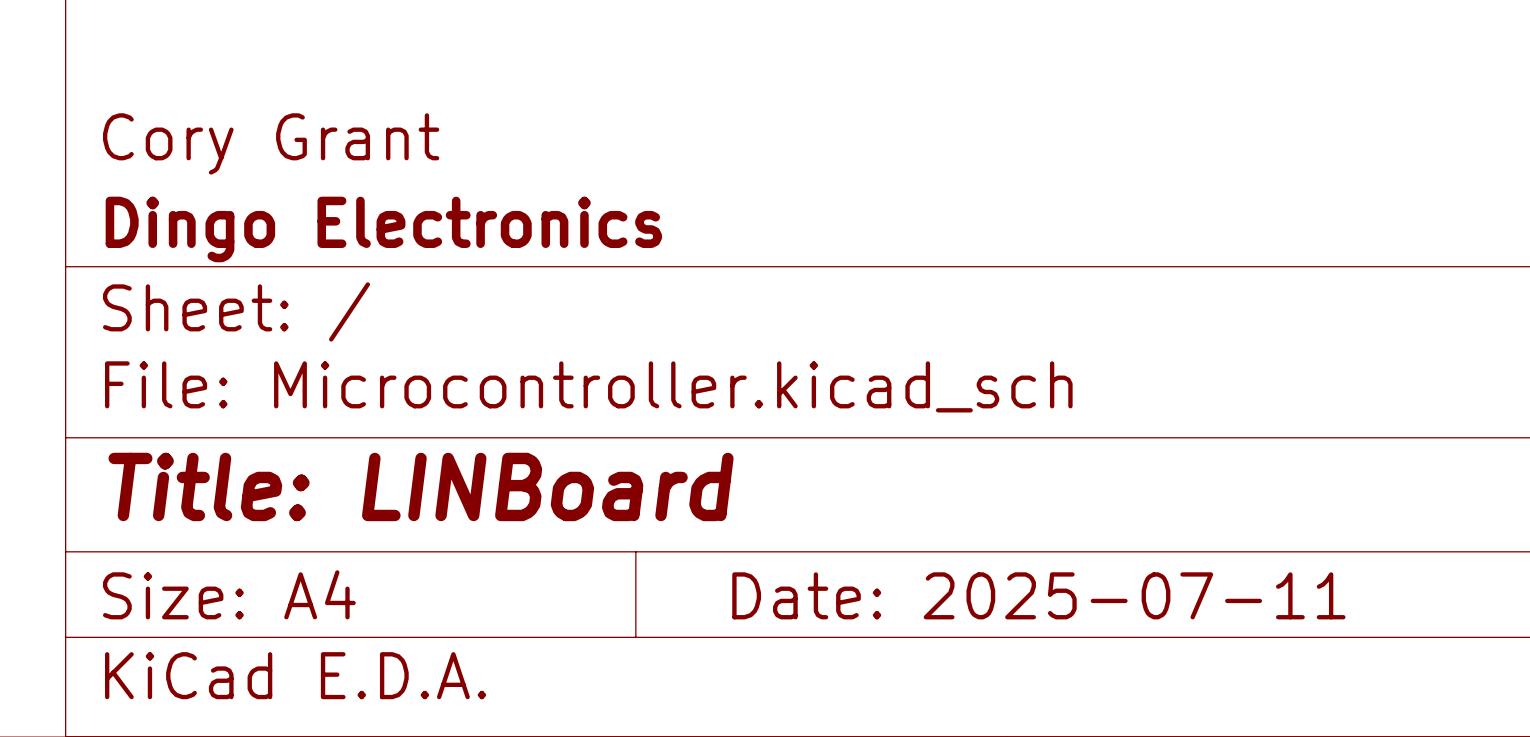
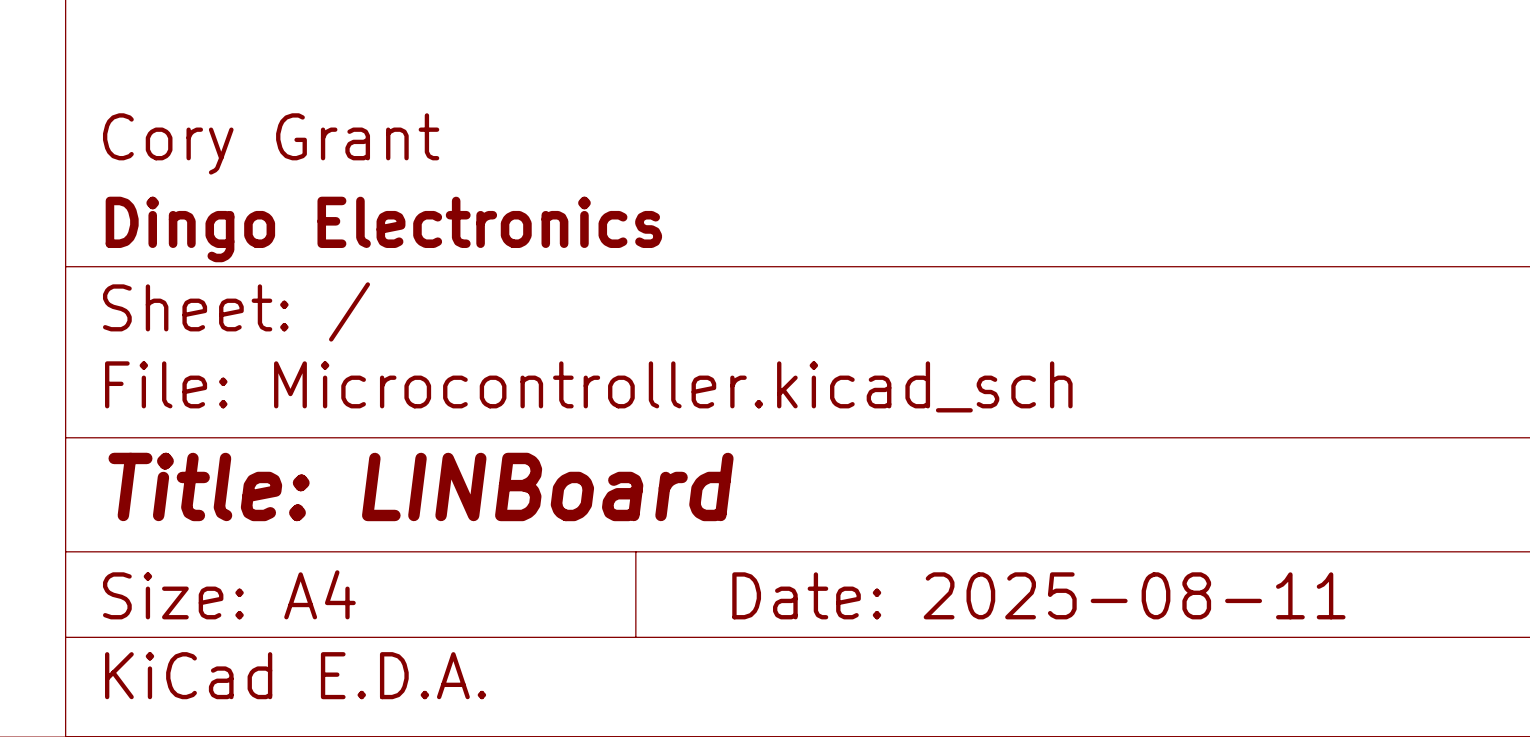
title block: Date: 2025-07-11 (1038, 595) -> Date: 2025-08-11 (1038, 595)

